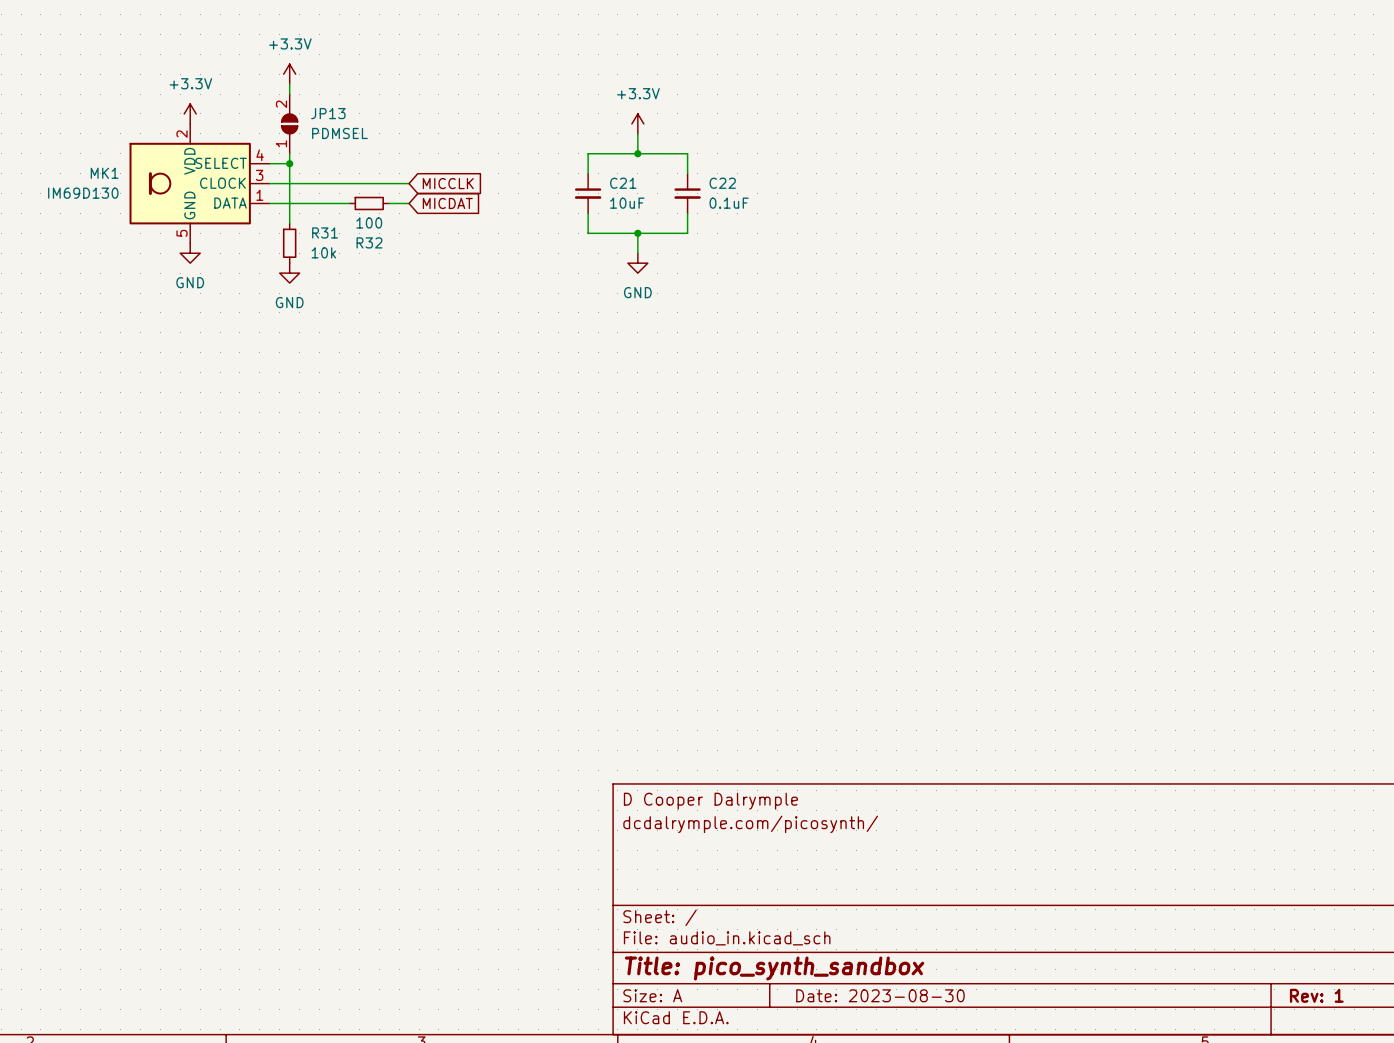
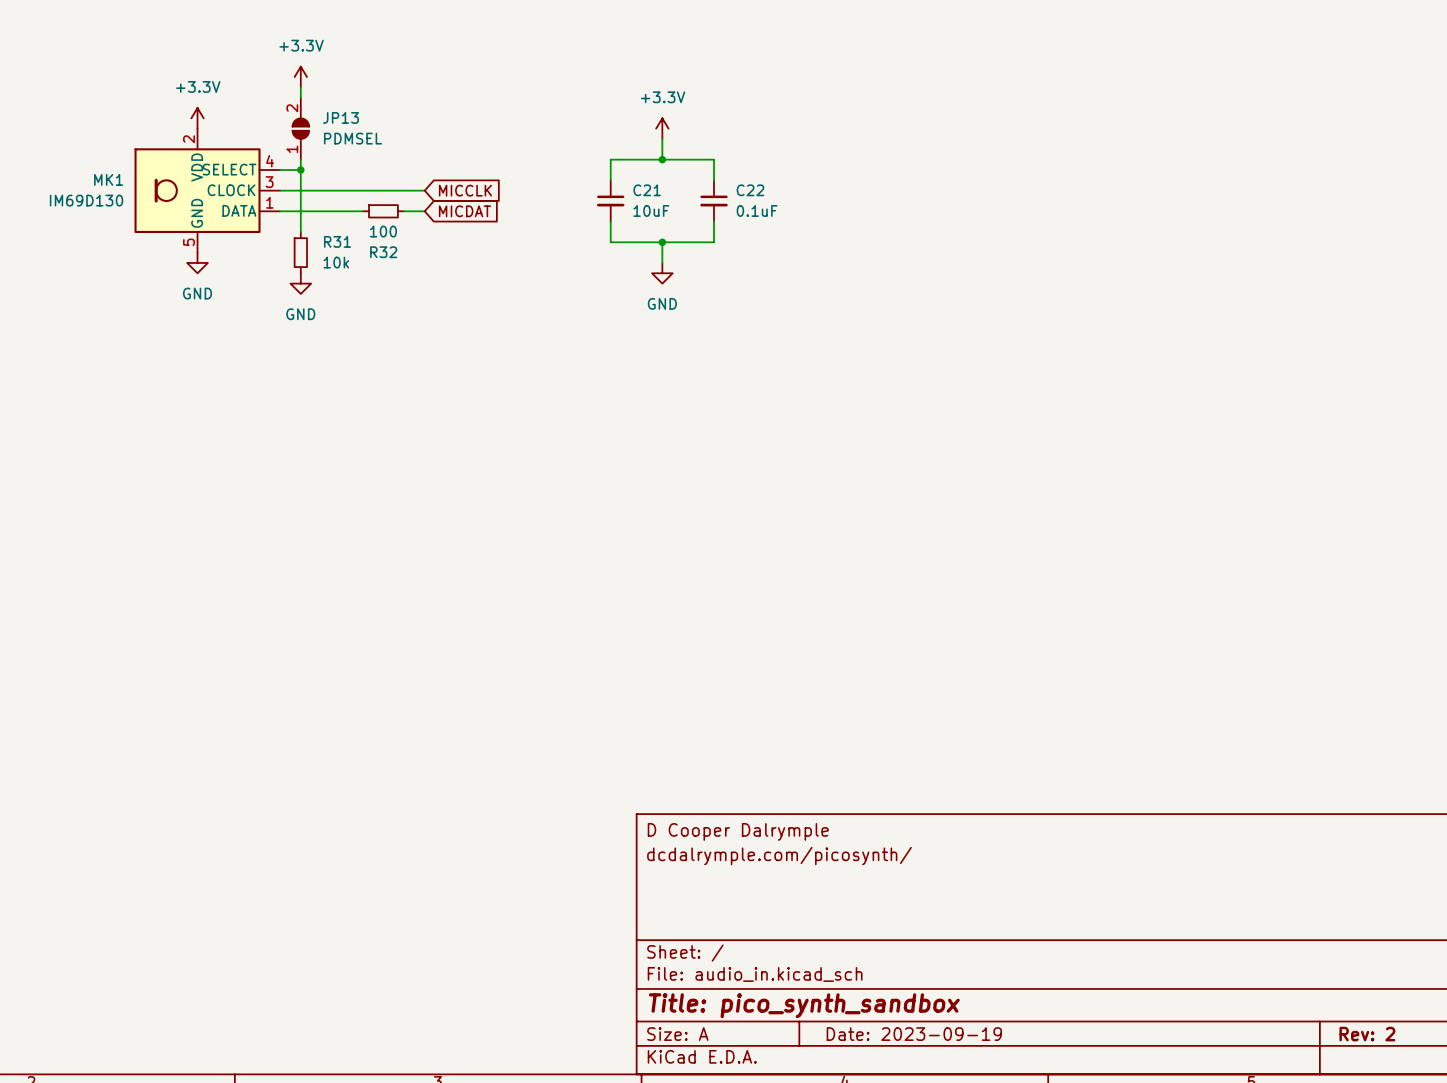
title block: Date: 2023-08-30 (880, 995) -> Date: 2023-09-19 (914, 1034)
title block: Rev: 1 (1316, 995) -> Rev: 2 (1367, 1034)

